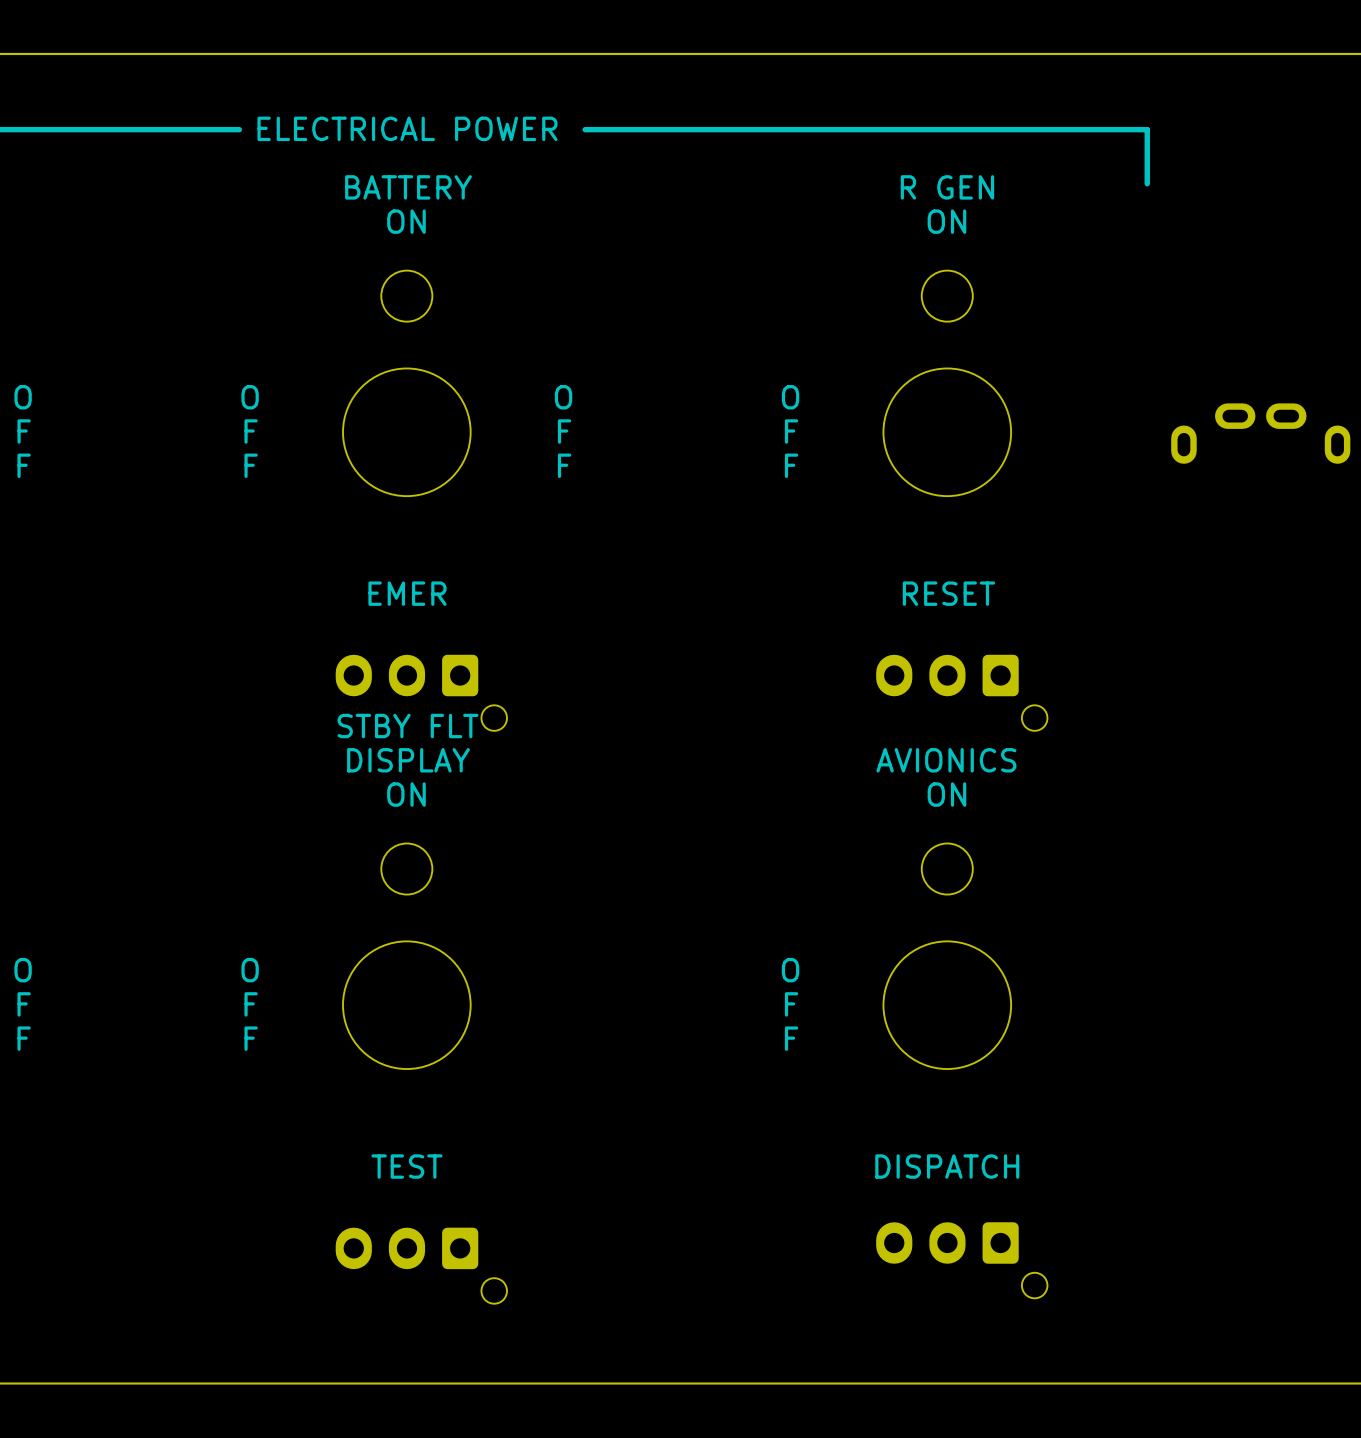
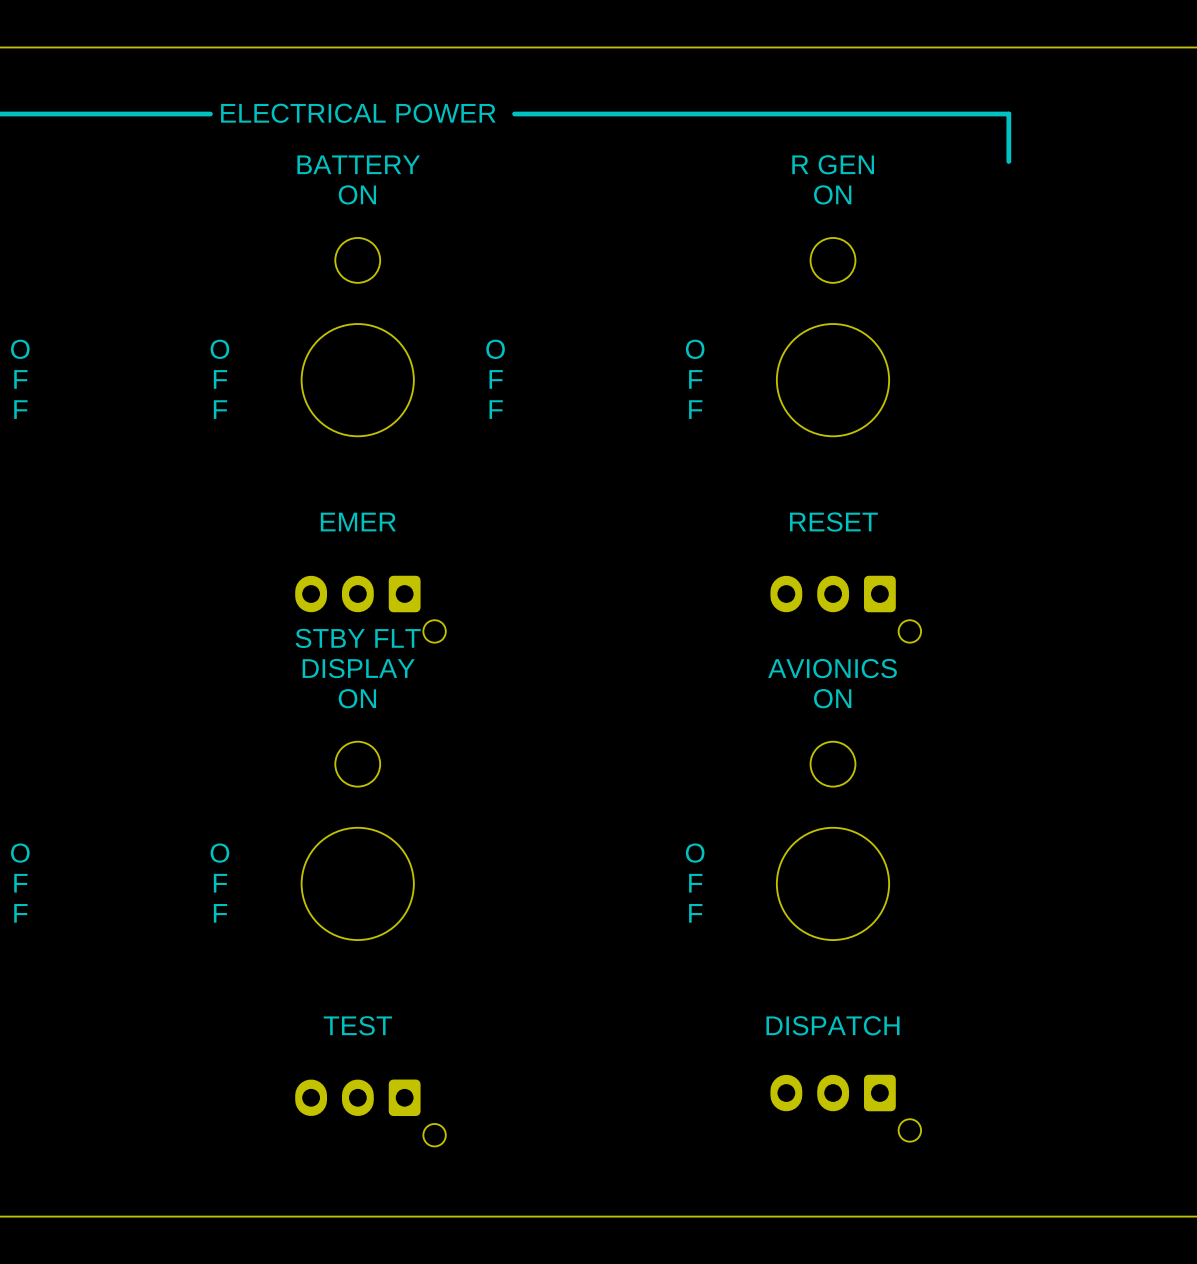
part: (1260, 433) -> none

